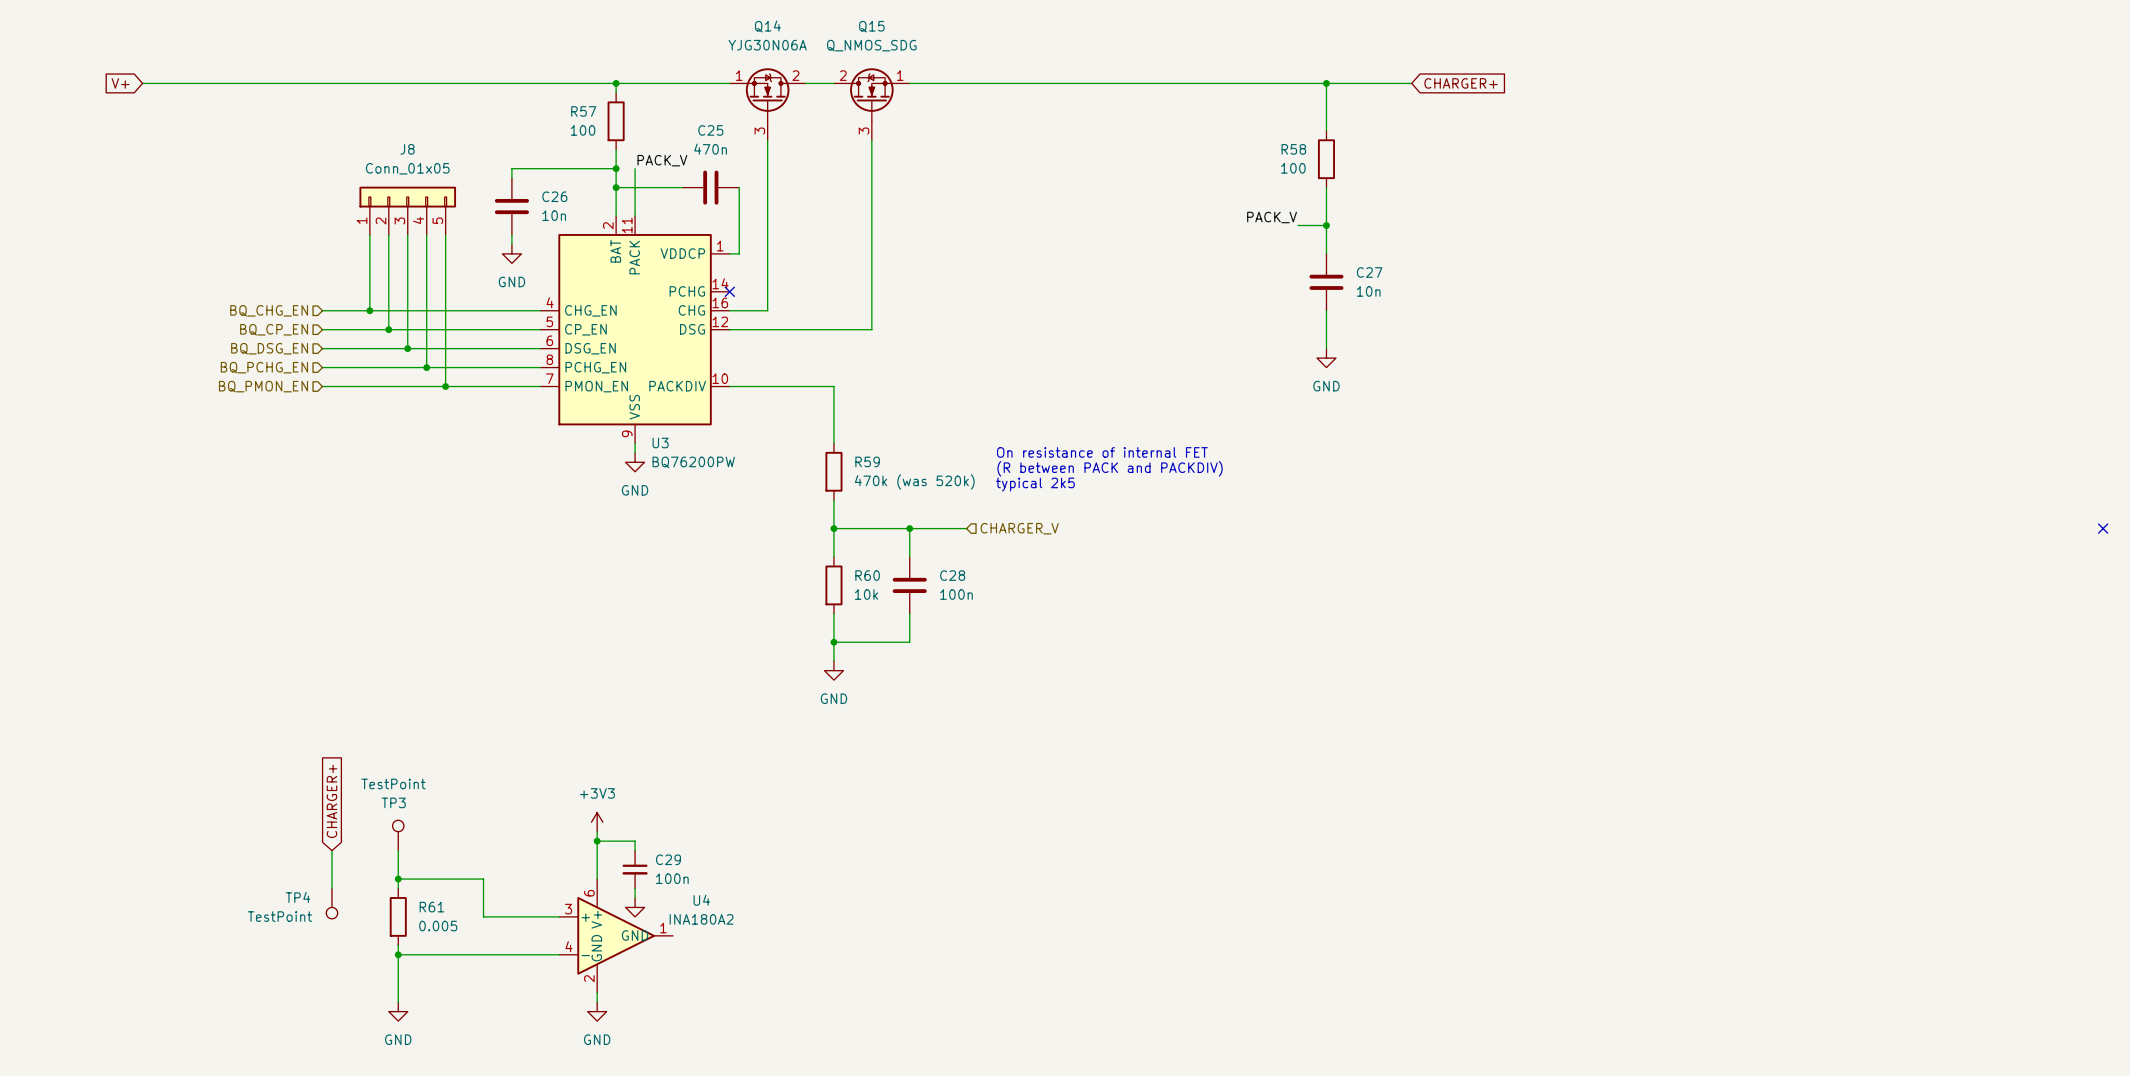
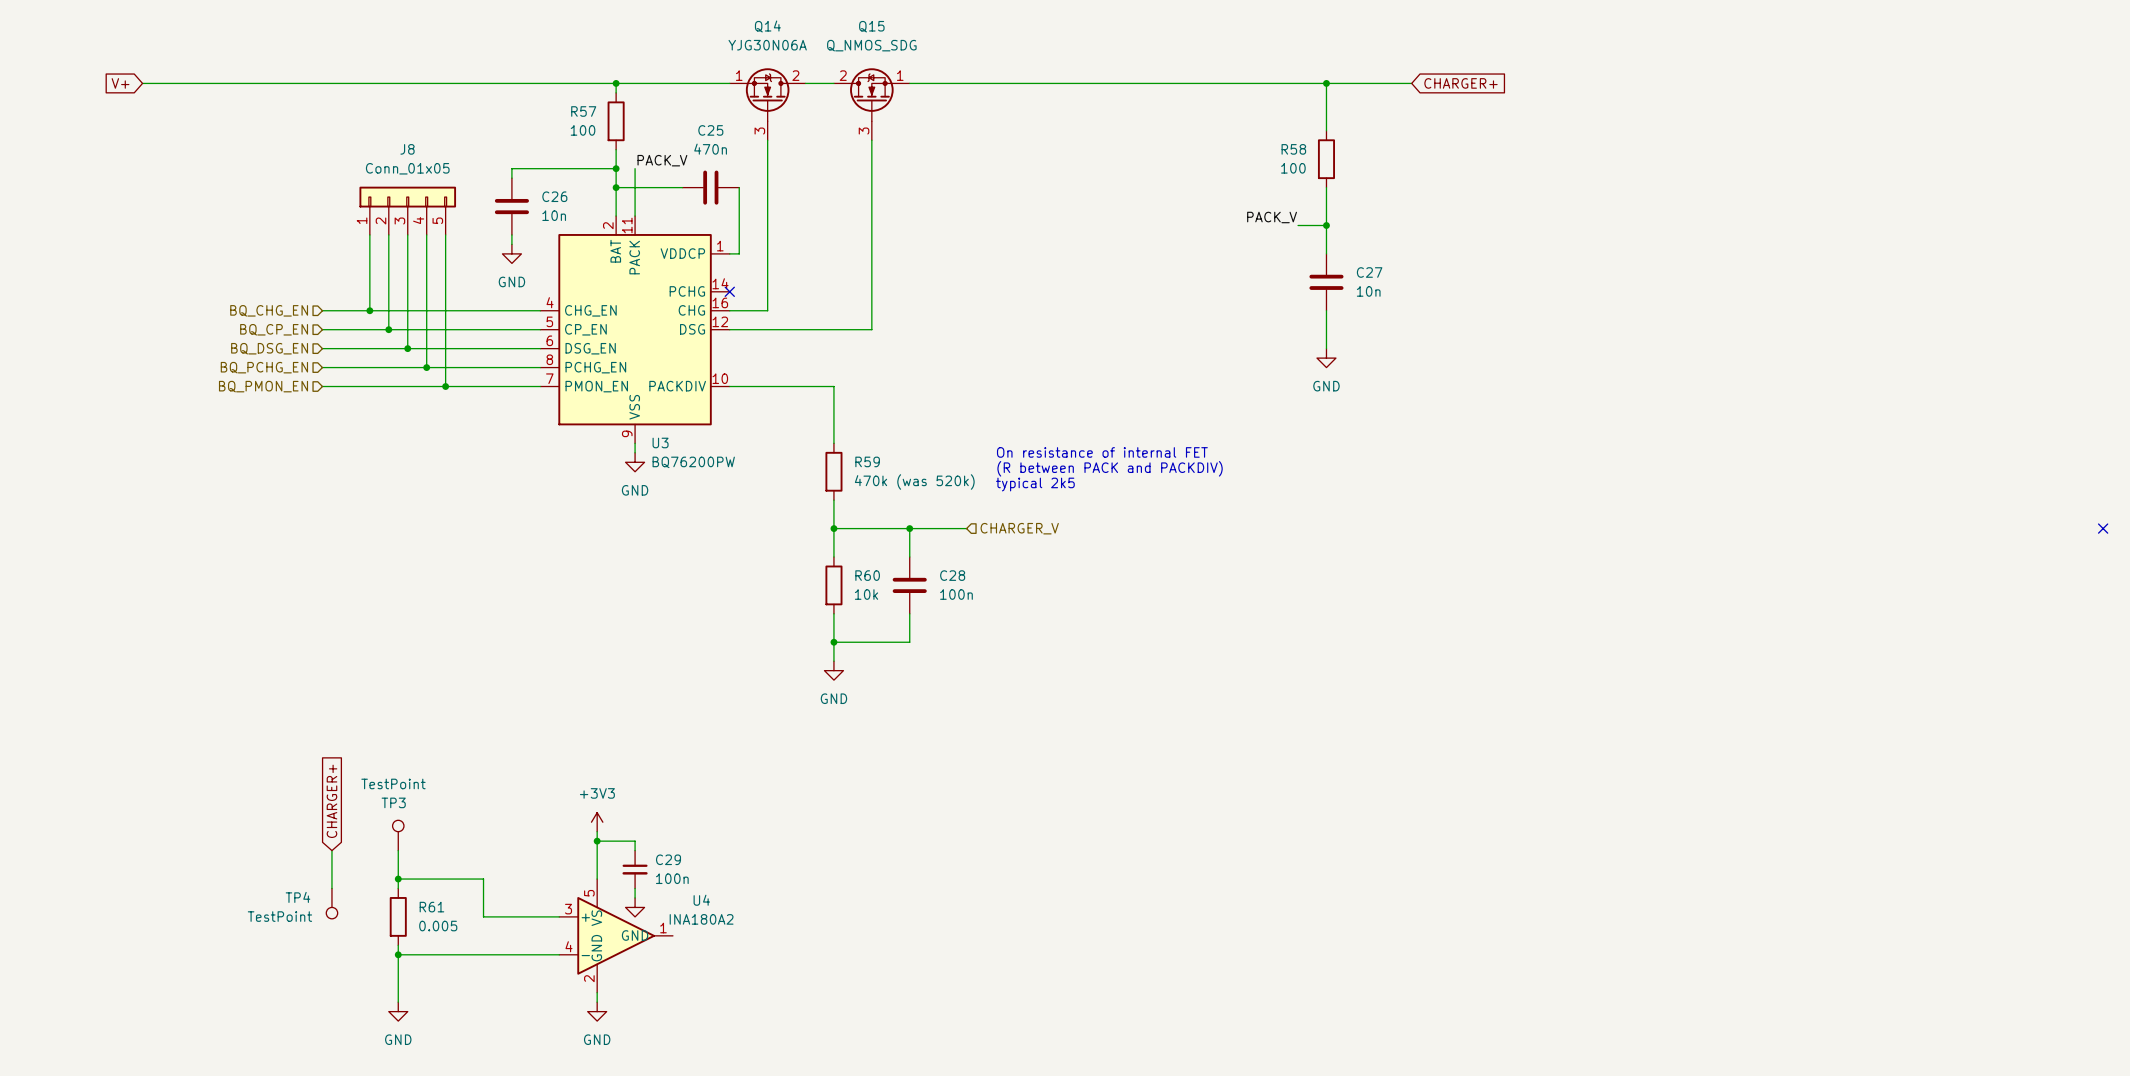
U4 pin number: 6 (589, 893) -> 5 (589, 893)
U4 pin name: V+ (596, 919) -> VS (596, 918)

